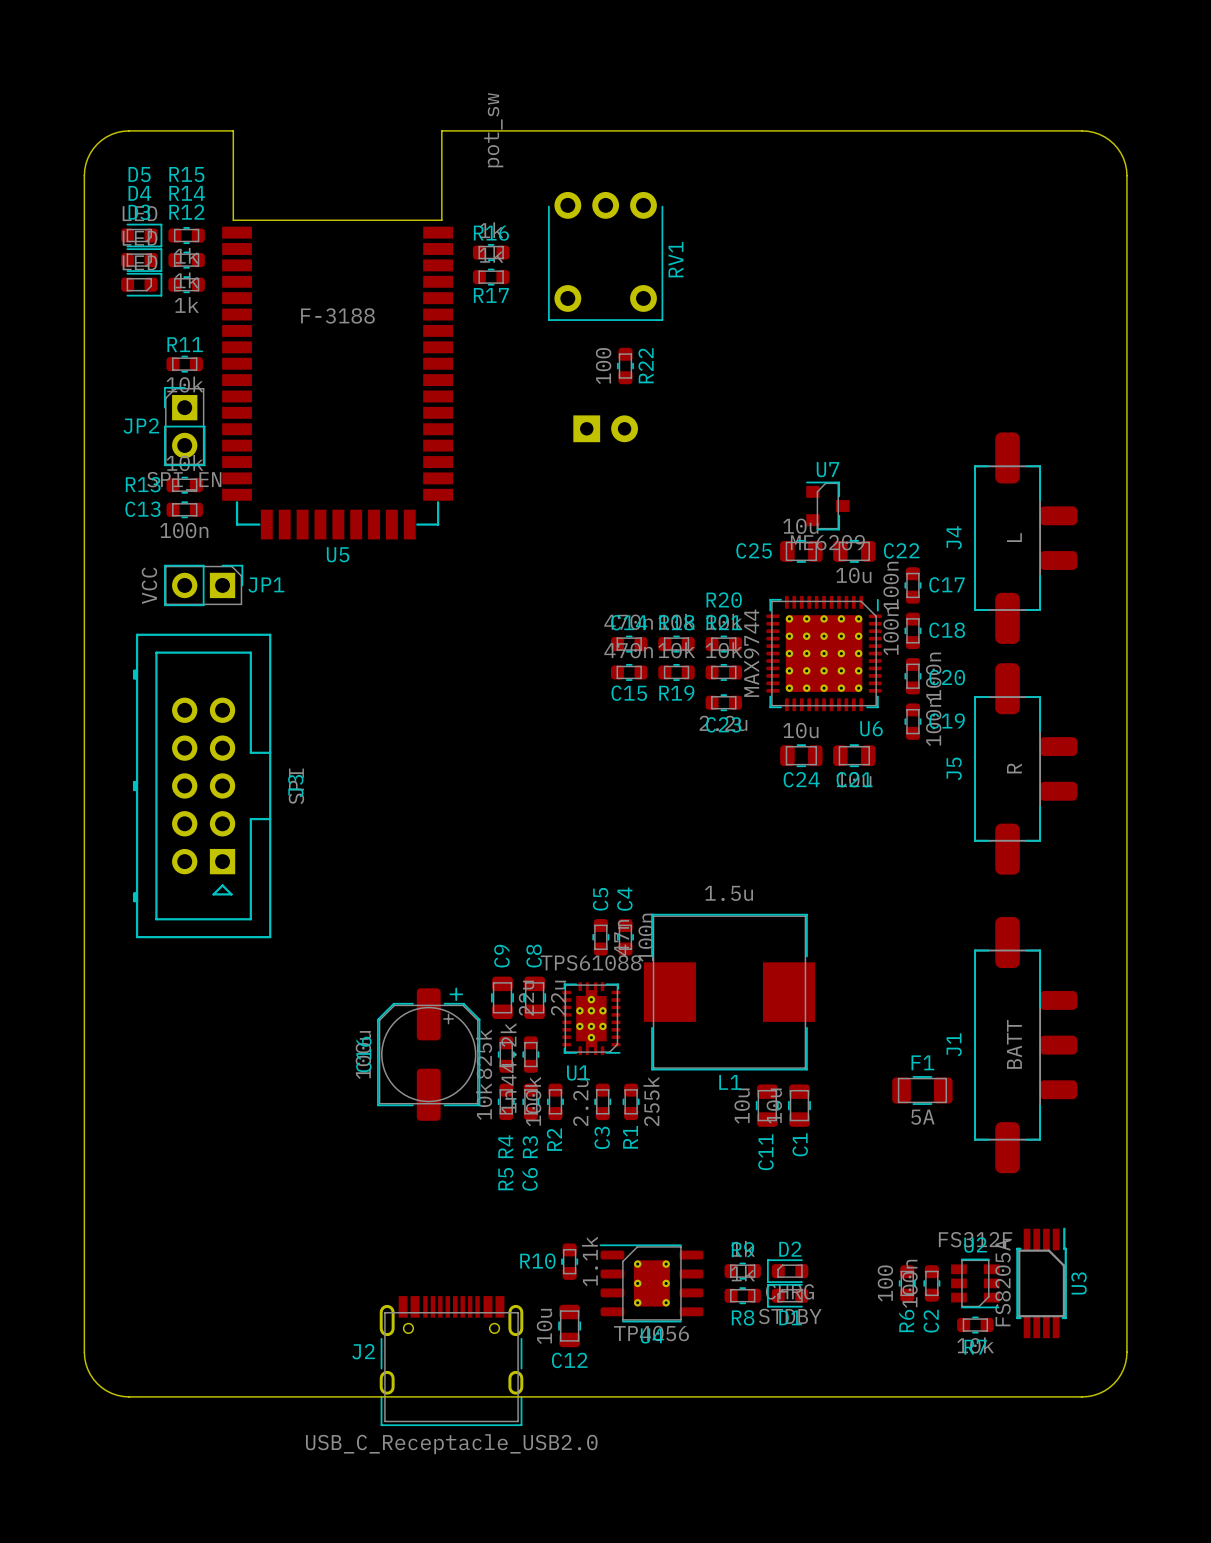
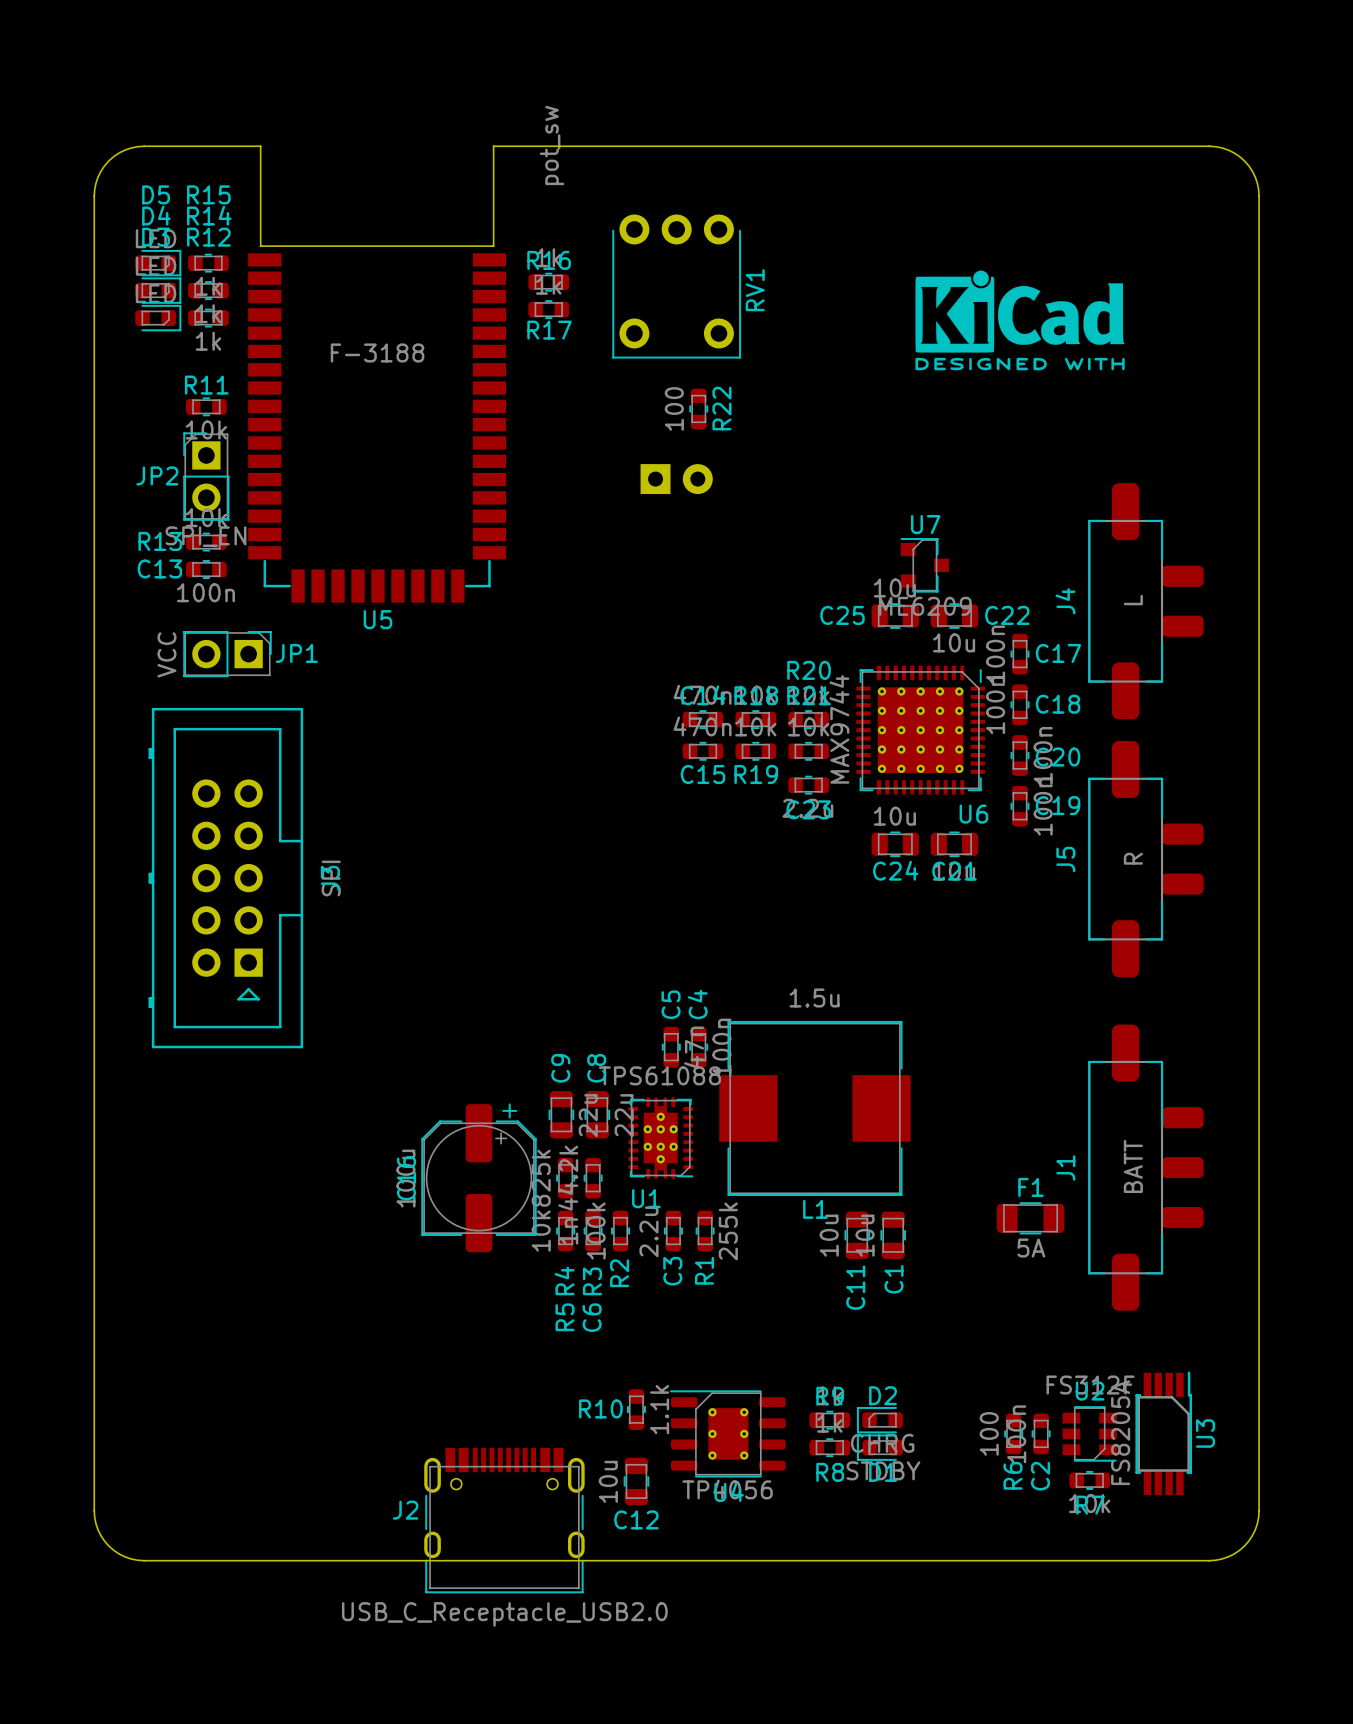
drawing: none -> [915, 270, 1125, 371]

